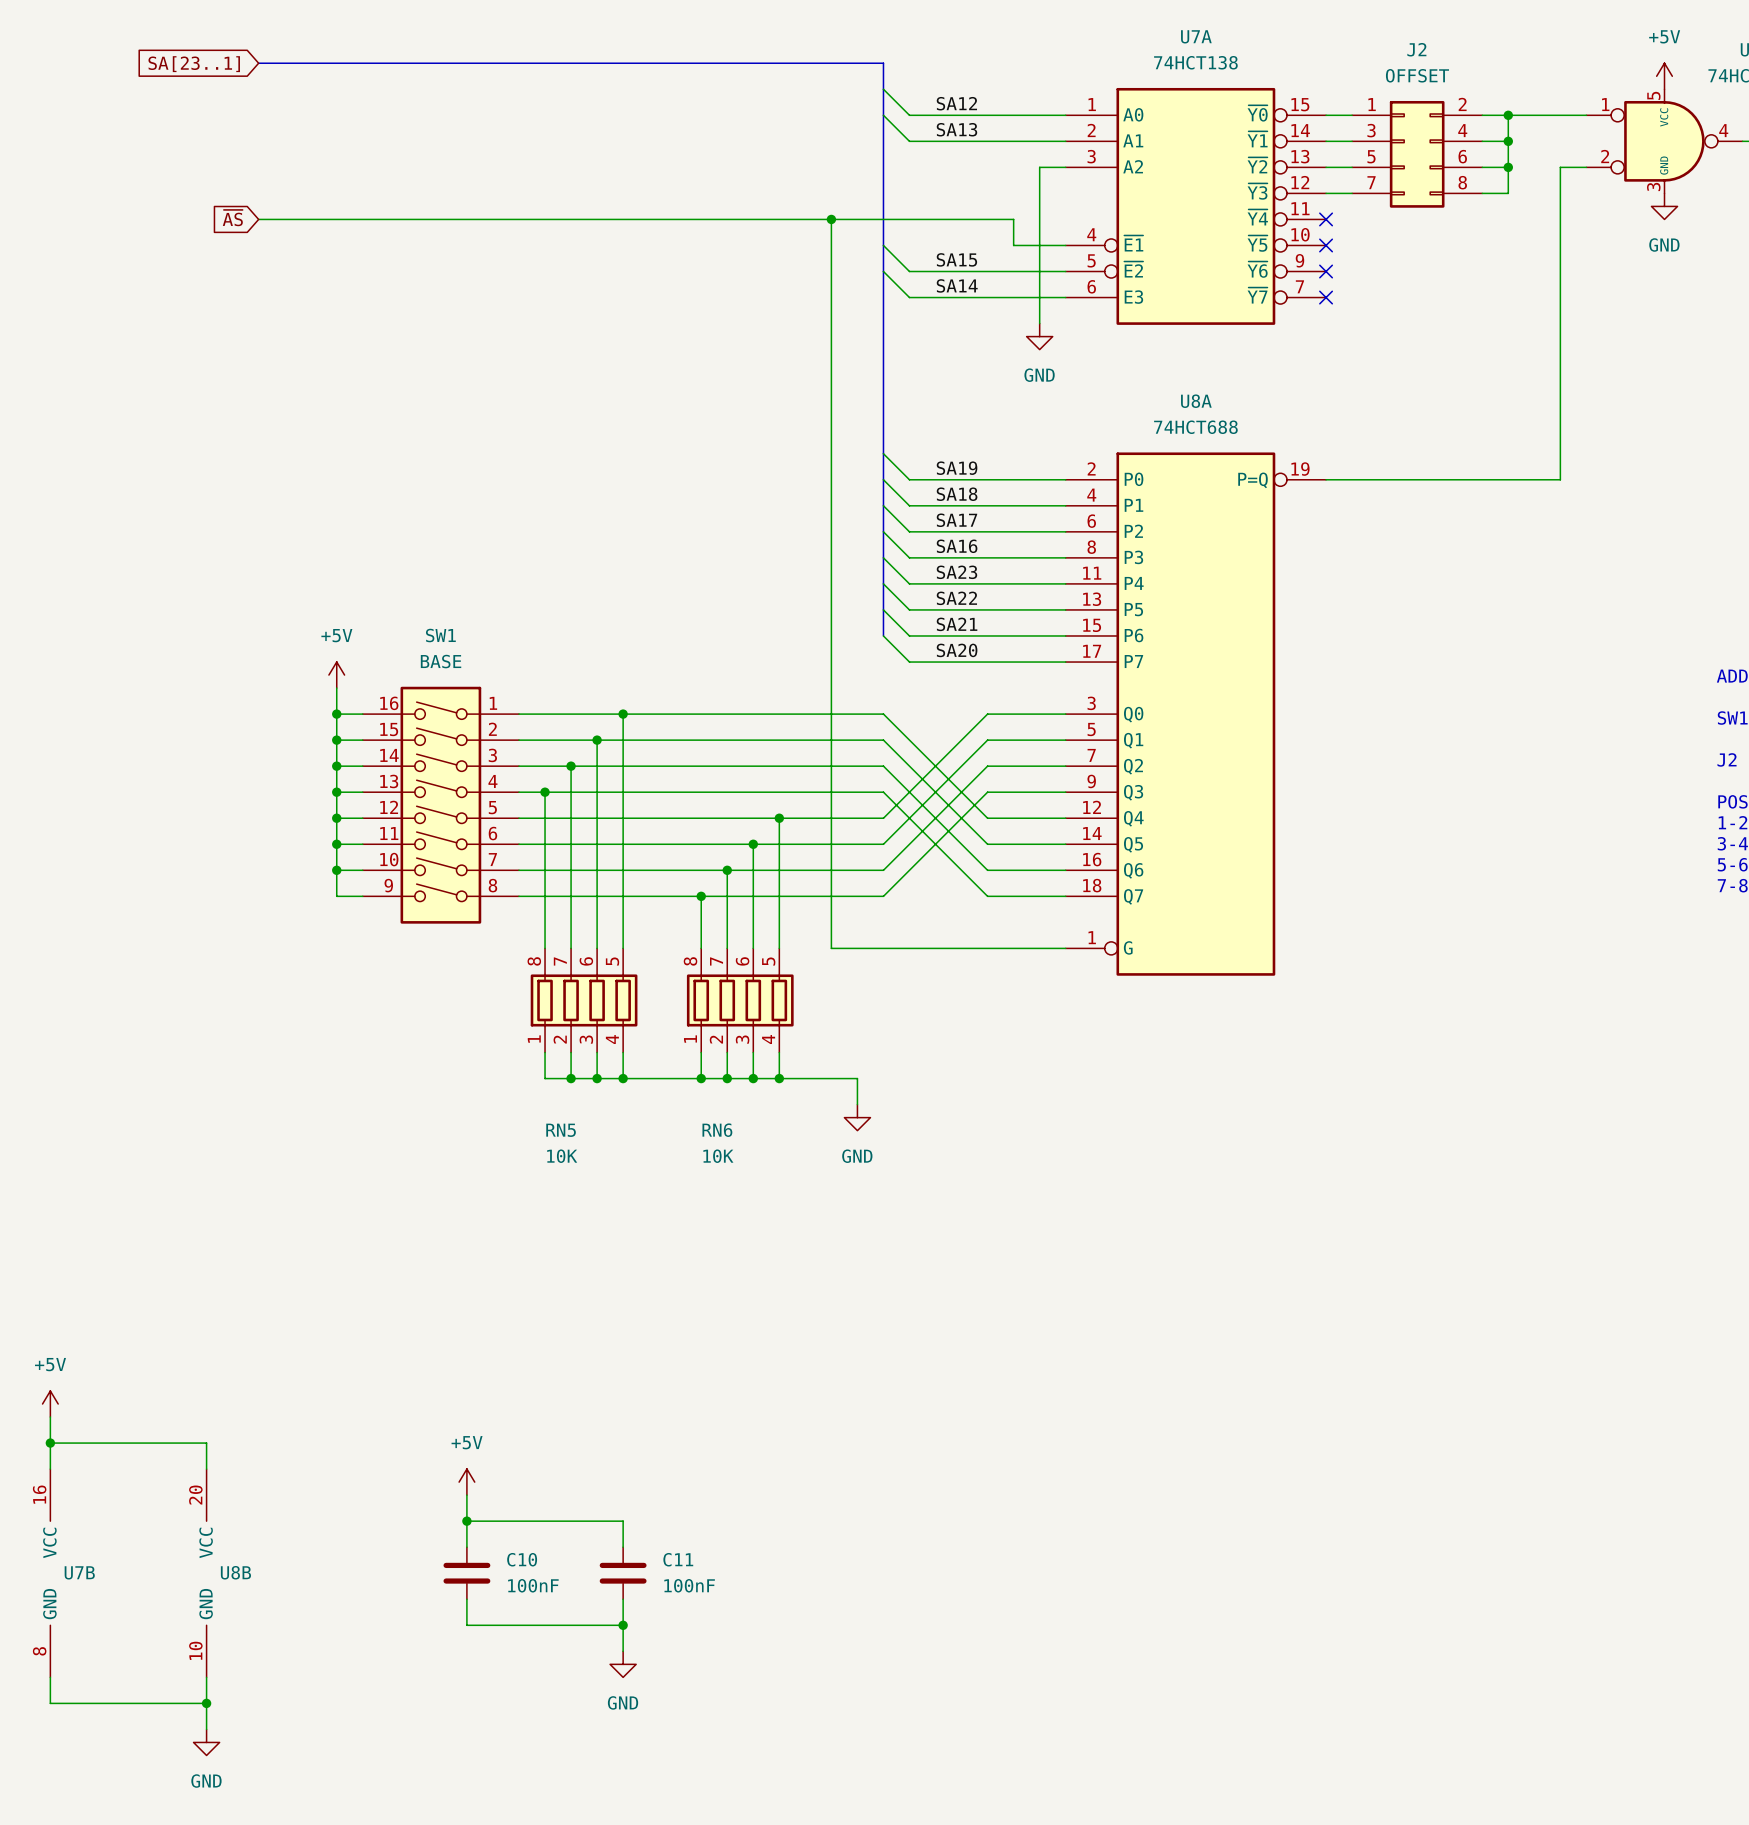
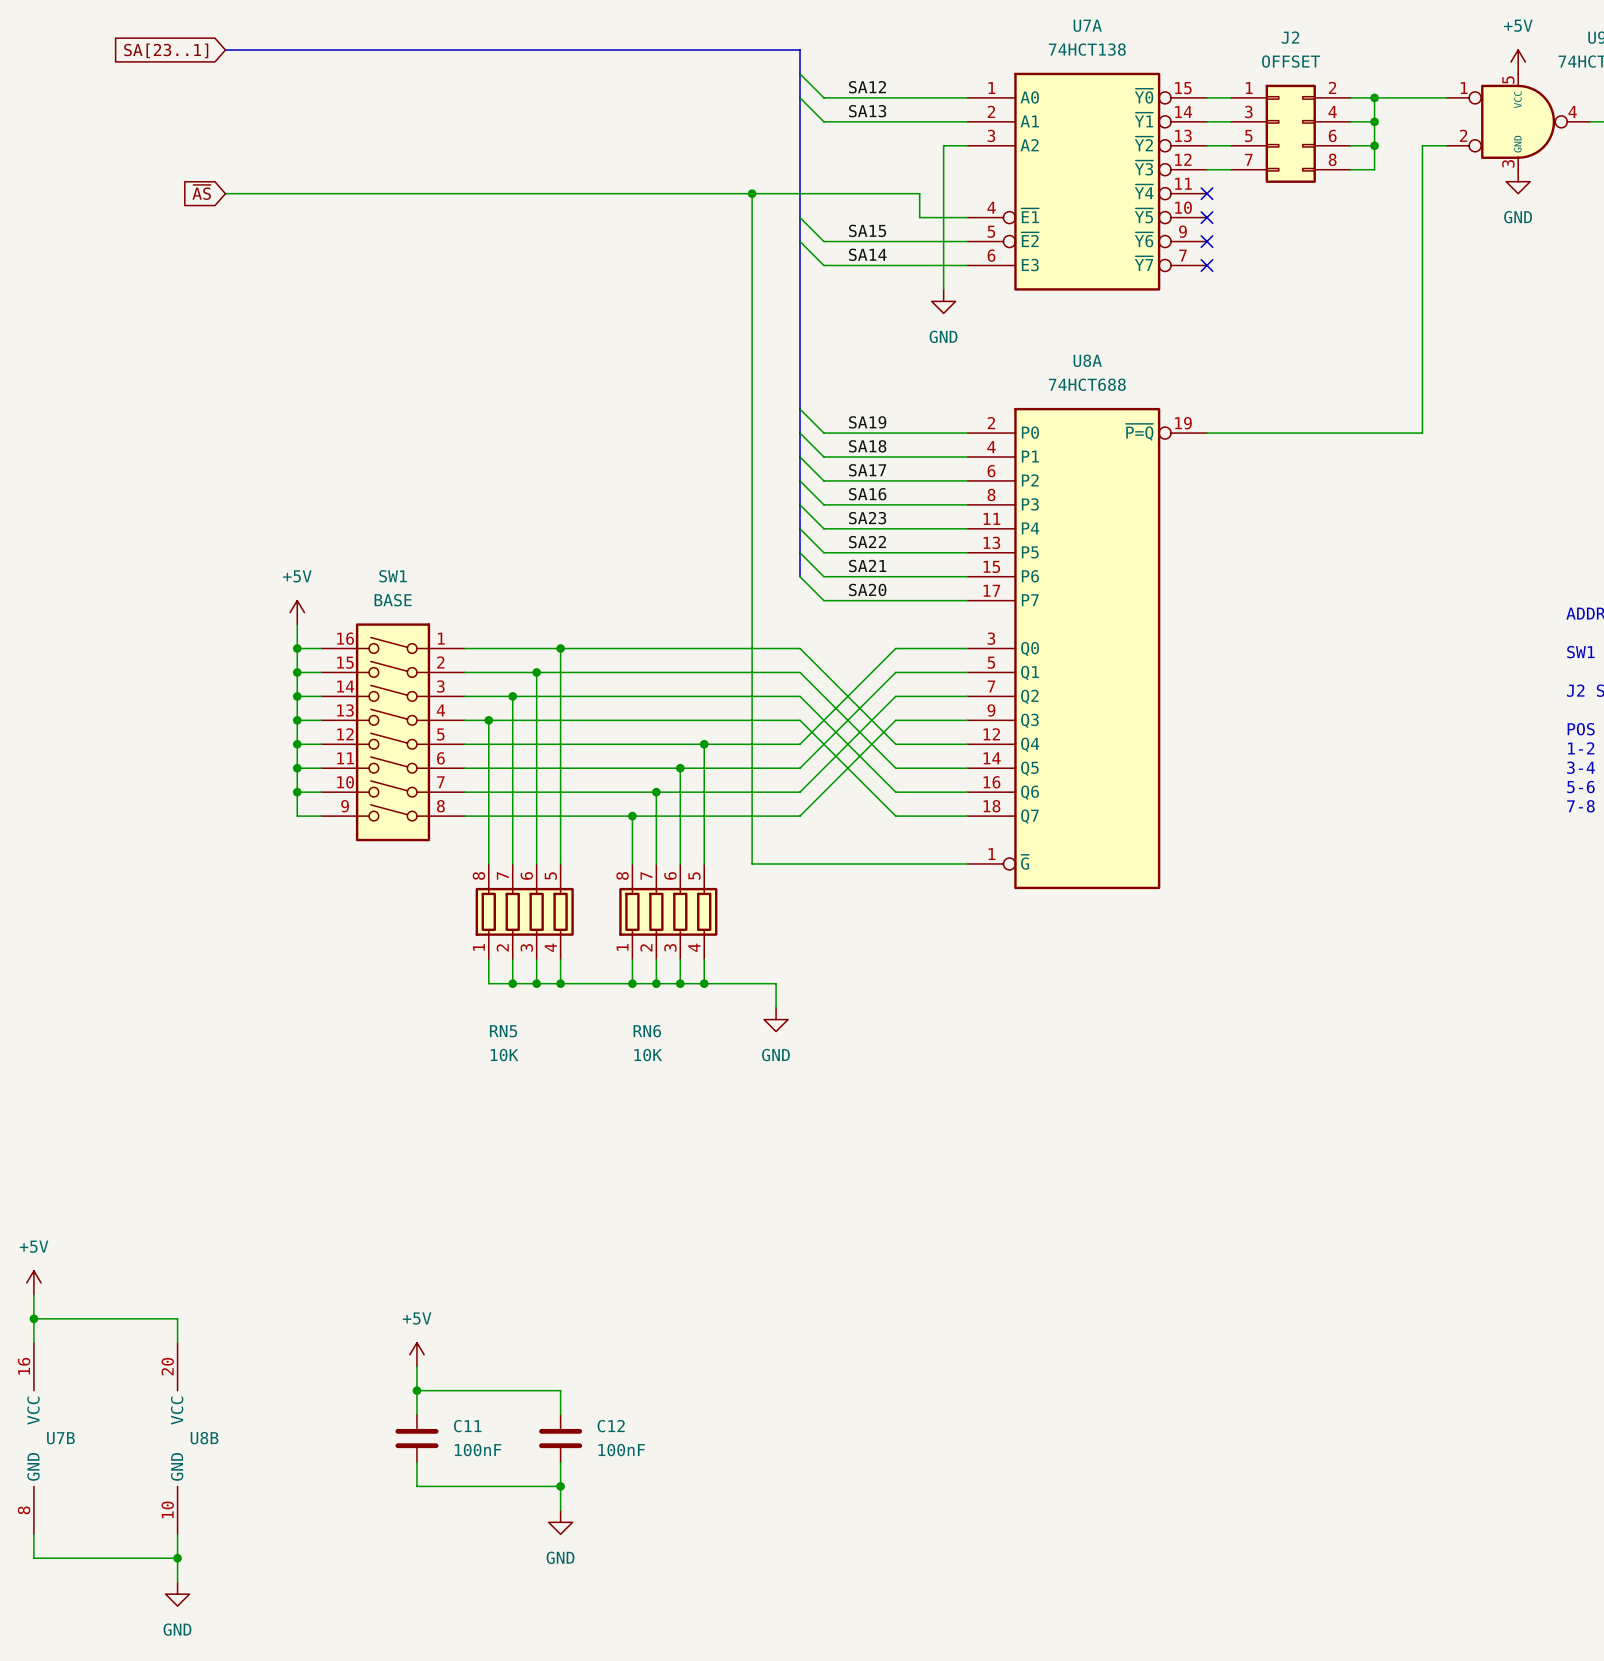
U8A pin name: P=Q (1253, 480) -> ~{P=Q} (1139, 432)
U8A pin name: G (1128, 947) -> ~{G} (1025, 862)
C10 name: C10 (522, 1559) -> C11 (467, 1426)
C11 name: C11 (678, 1559) -> C12 (611, 1426)

